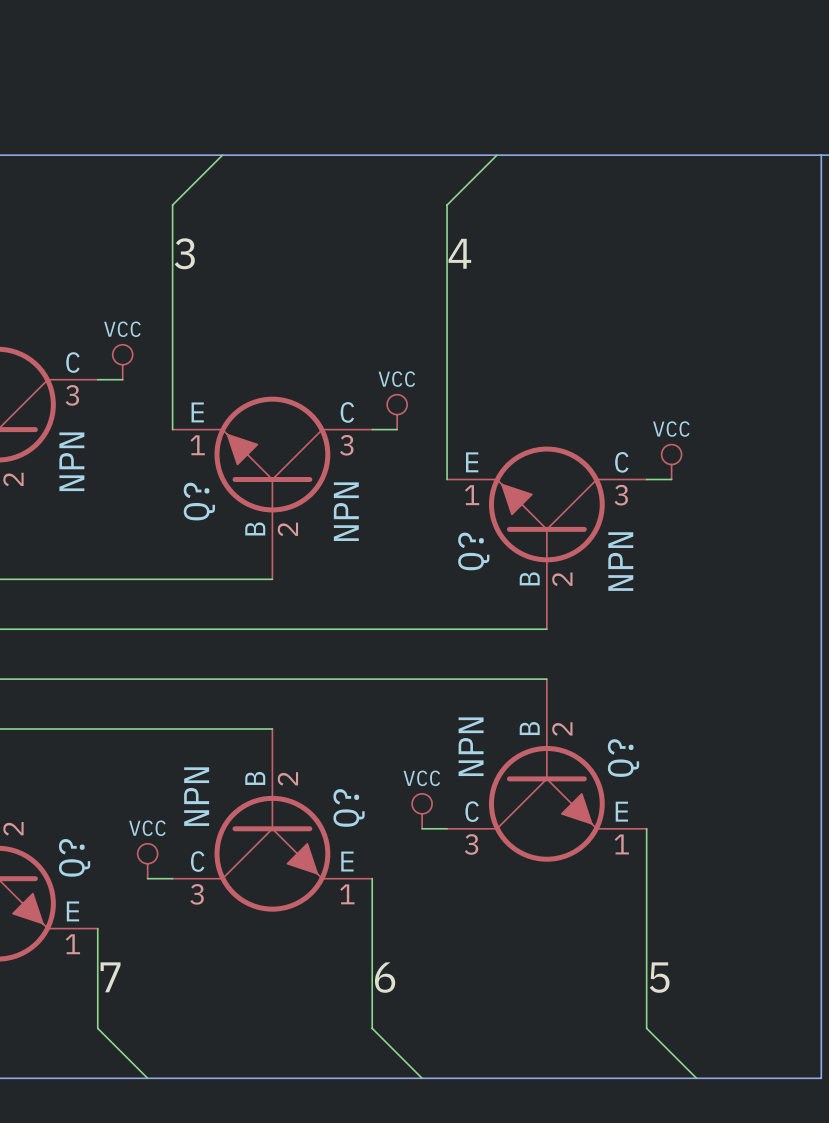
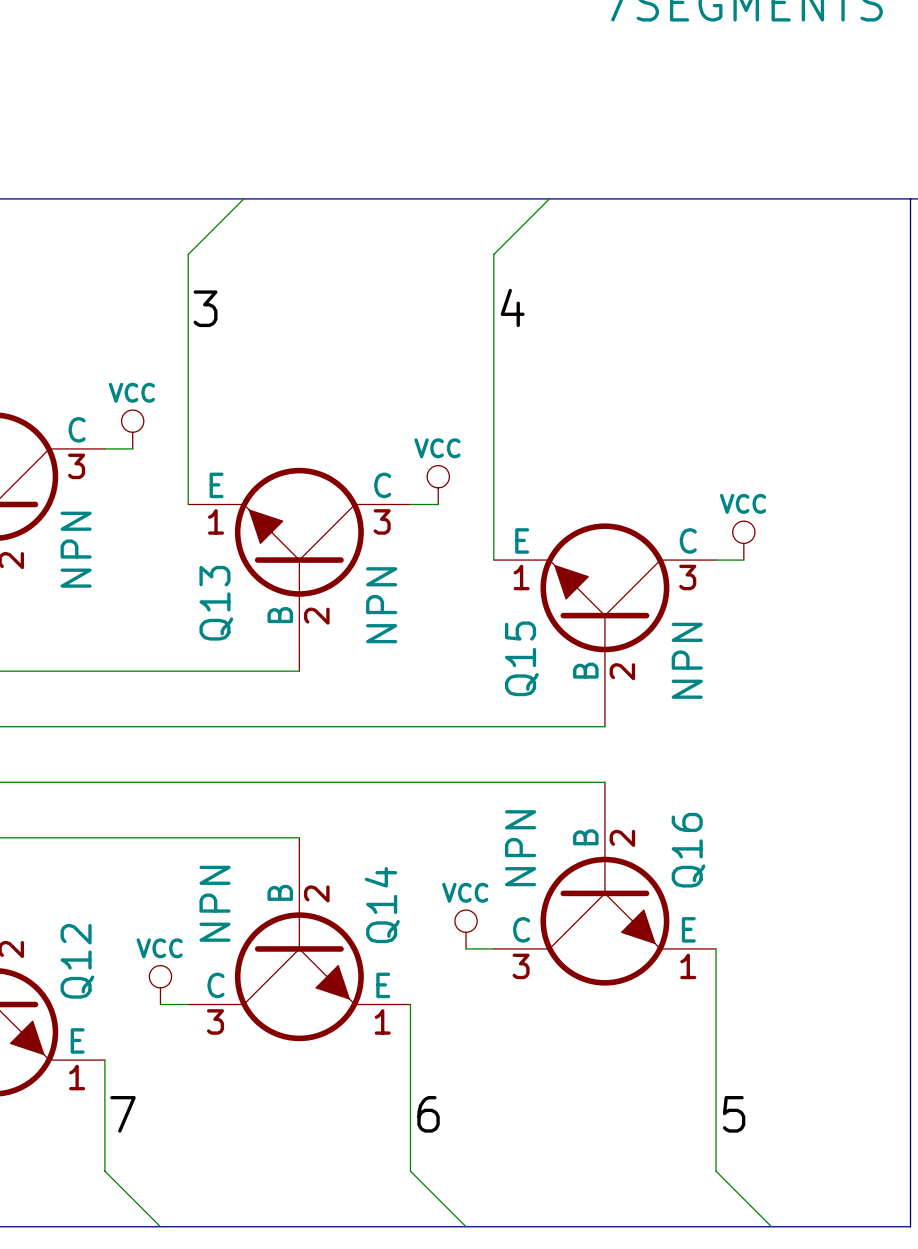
Q? name: Q? (199, 501) -> Q13 (216, 603)
Q? name: Q? (473, 551) -> Q15 (521, 658)
Q? name: Q? (623, 758) -> Q16 (688, 850)
Q? name: Q? (349, 807) -> Q14 (382, 905)
Q? name: Q? (74, 857) -> Q12 (77, 961)

